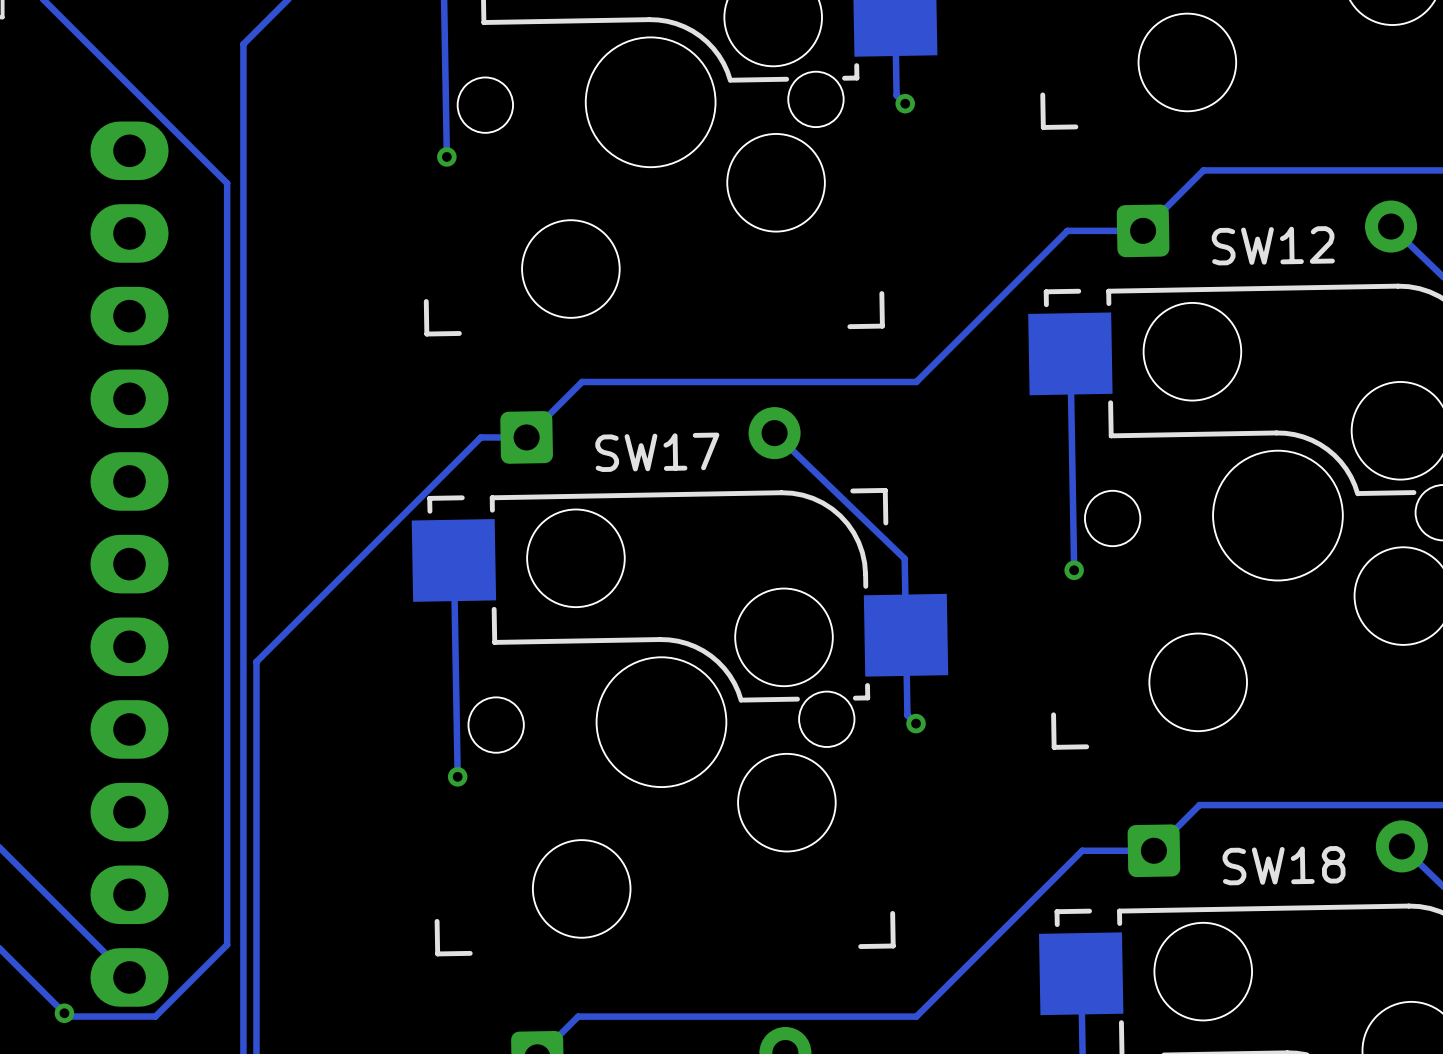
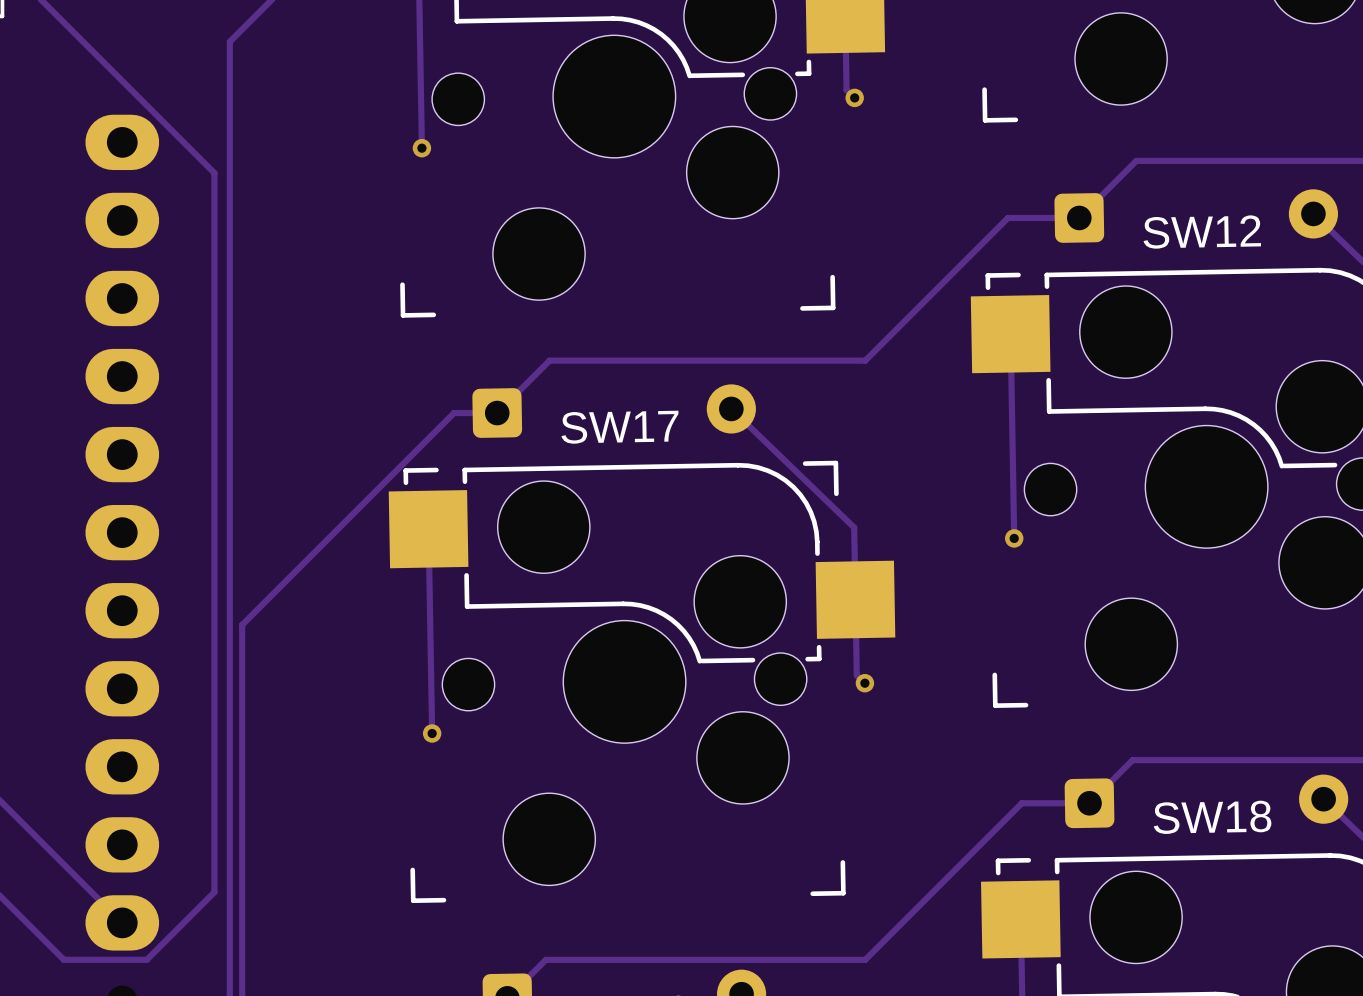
via: (64, 1013) -> none

